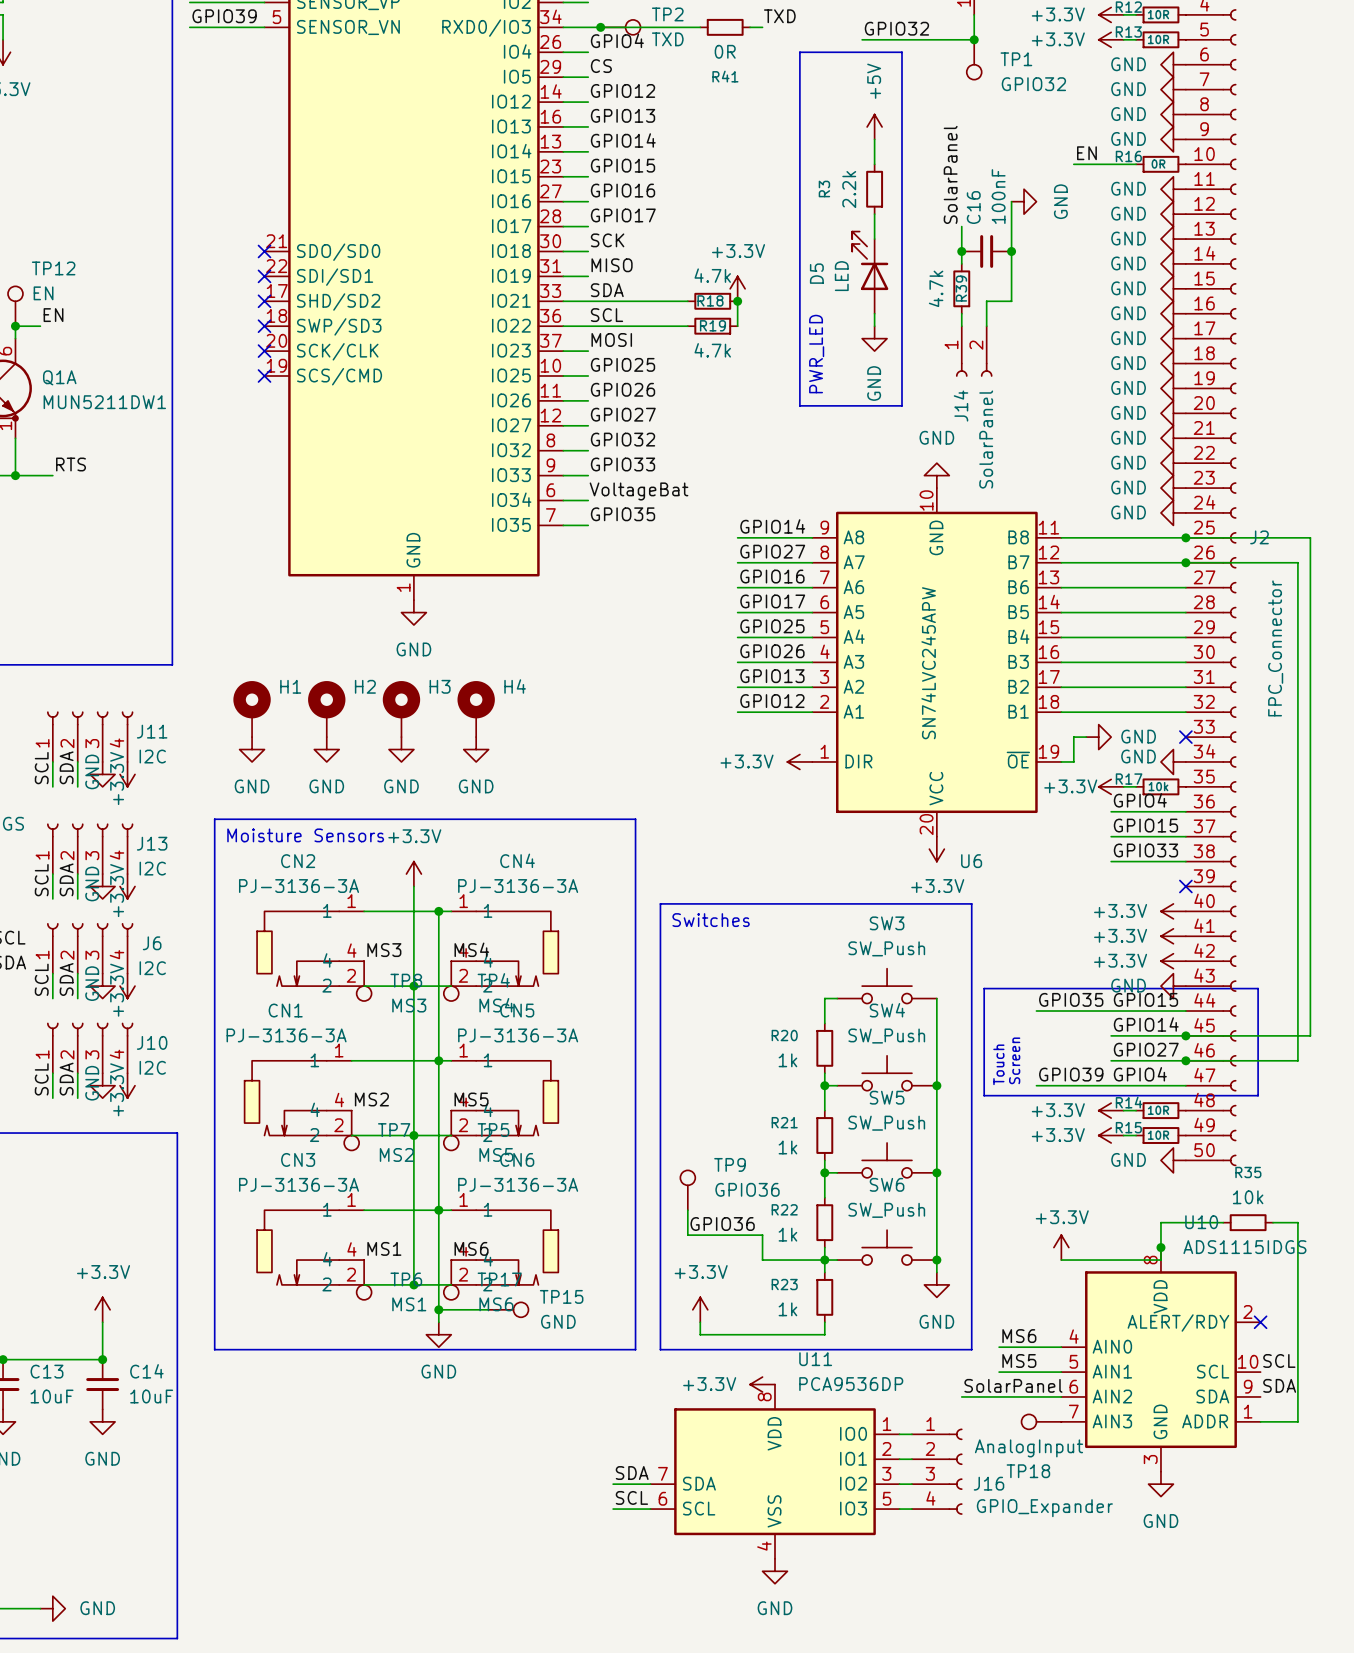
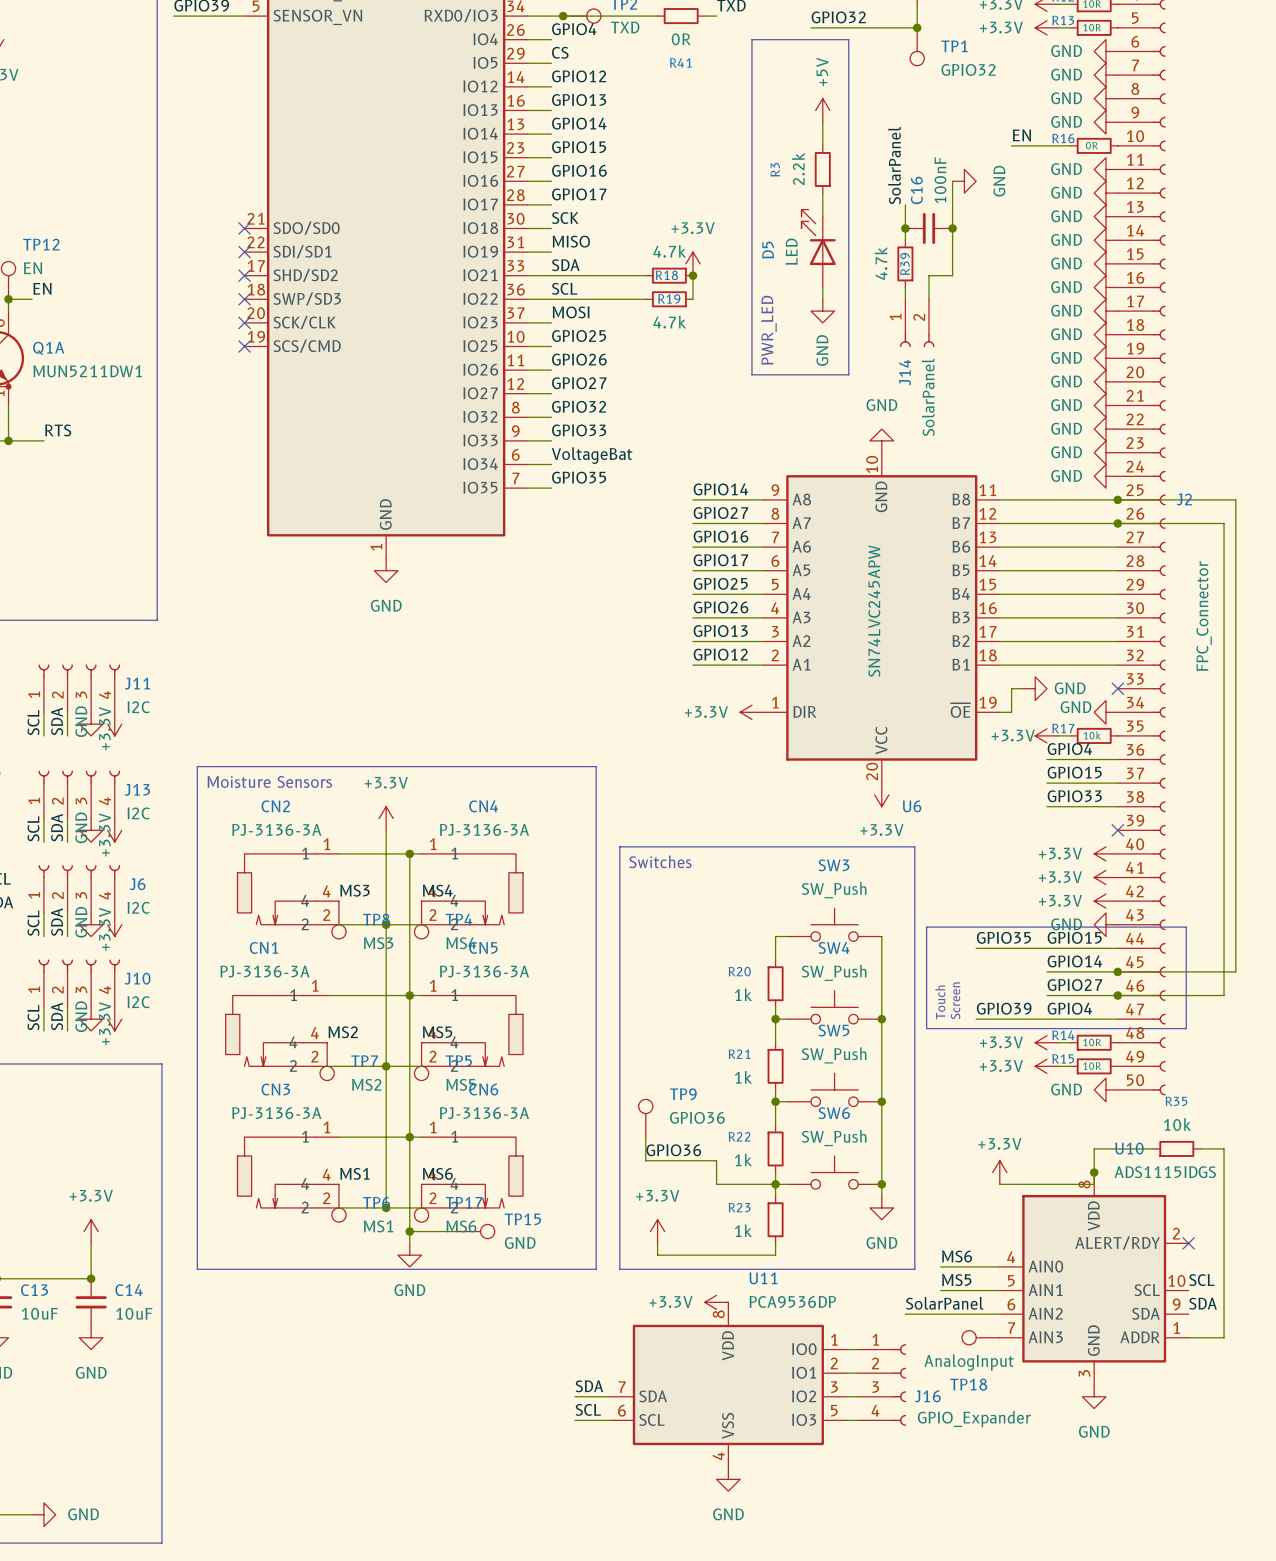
H1: (252, 709) -> none
H2: (326, 709) -> none
H3: (401, 709) -> none
H4: (476, 709) -> none
power symbol: GND (252, 749) -> none
power symbol: GND (326, 749) -> none
power symbol: GND (401, 749) -> none
power symbol: GND (476, 749) -> none

